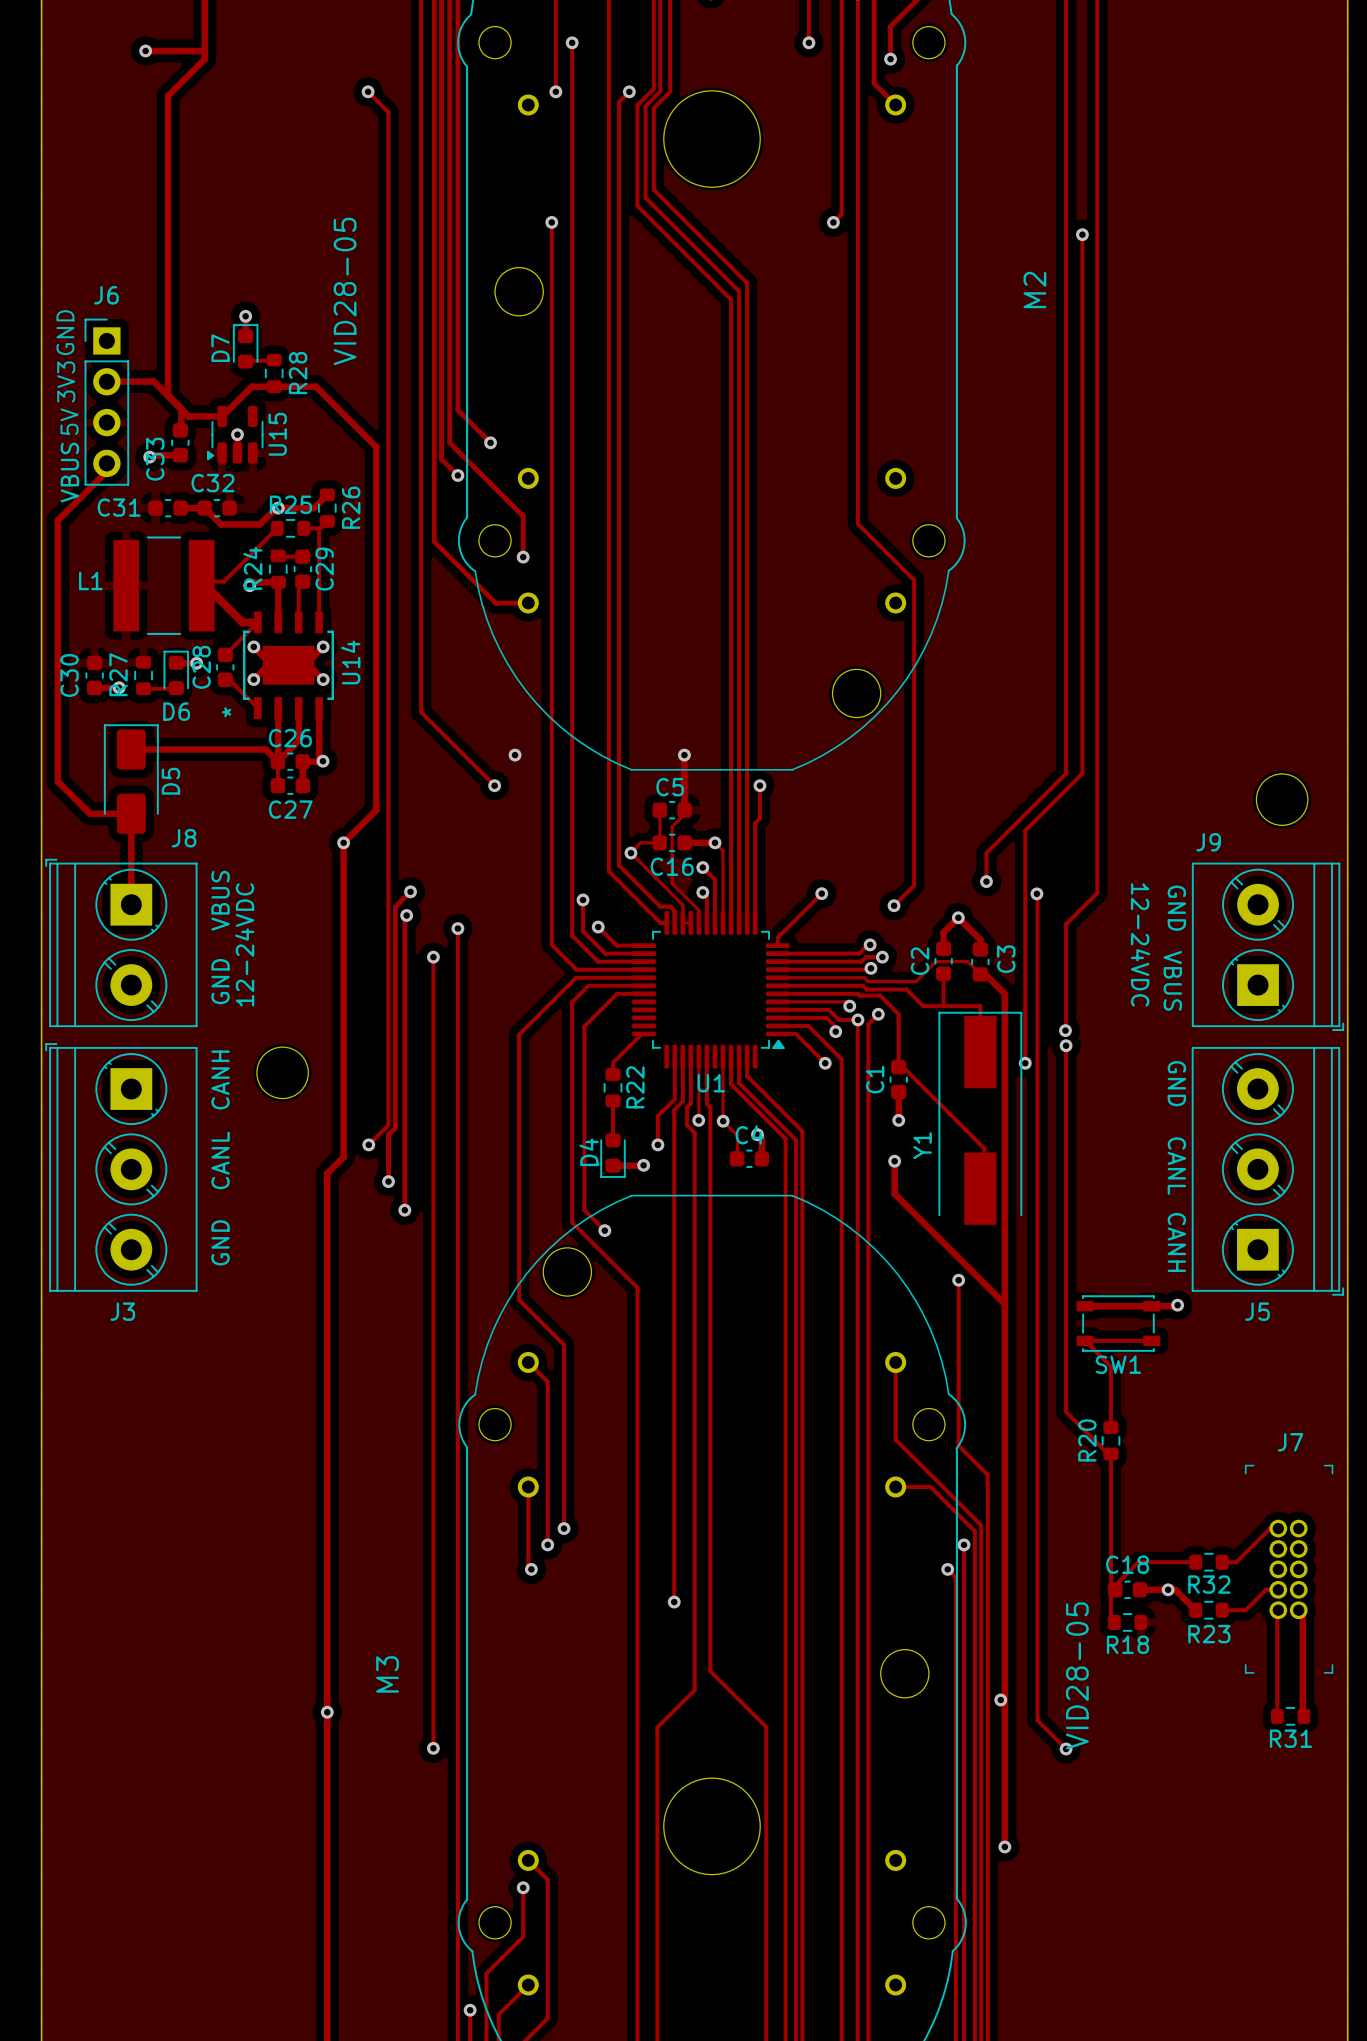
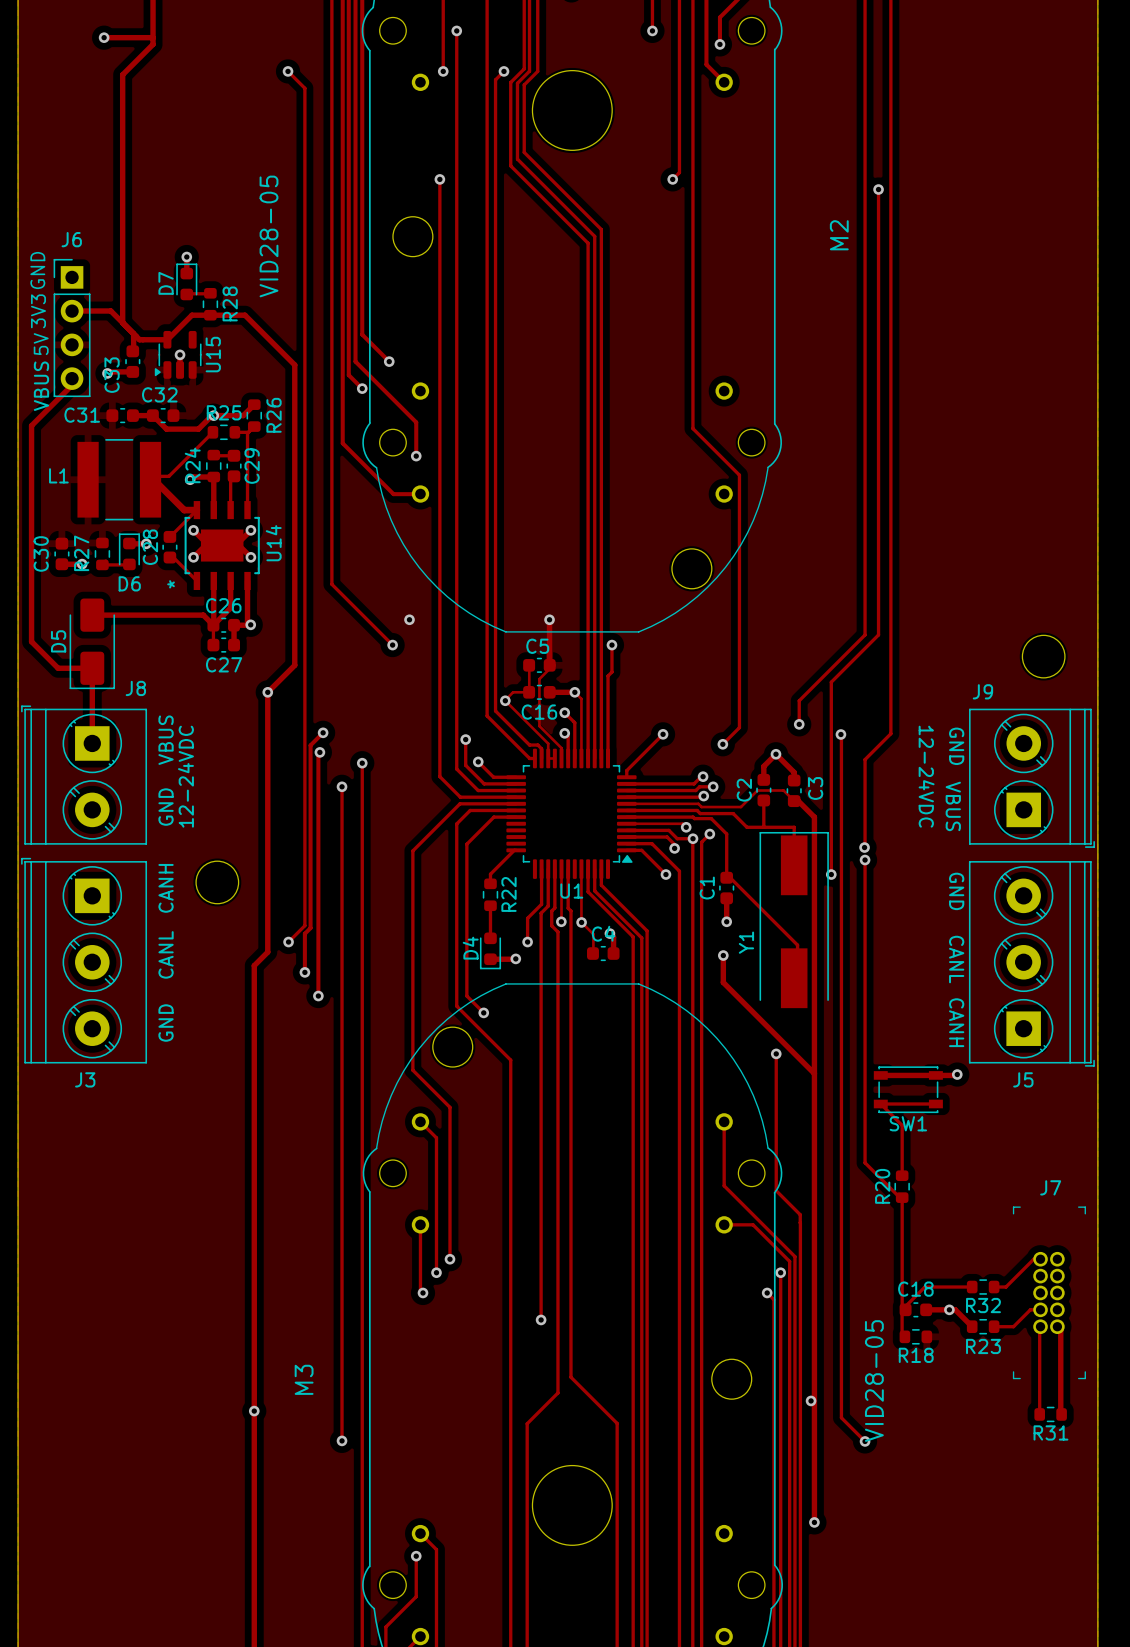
D5 rotation: 0° (131, 779) -> 180° (92, 643)

